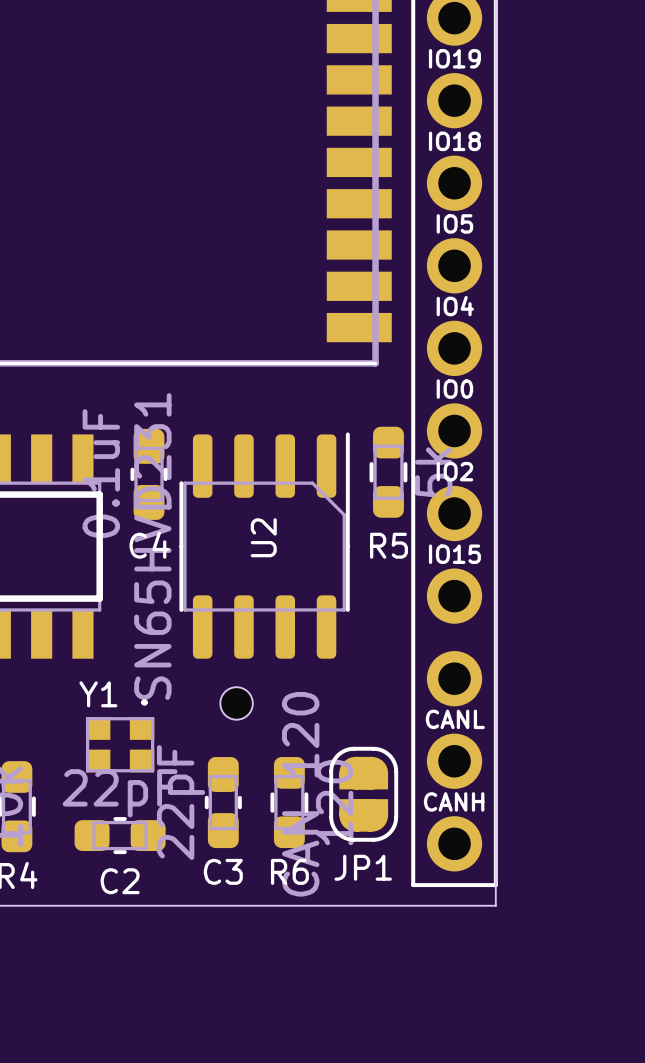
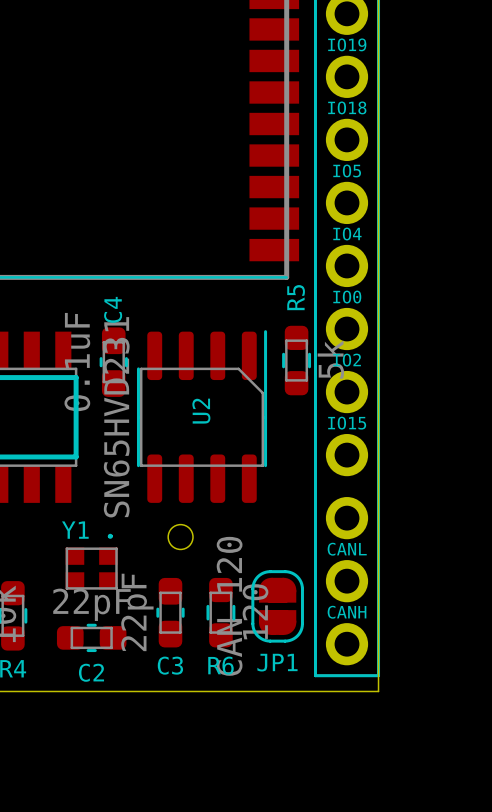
C4 name rotation: 0° (149, 545) -> 90° counterclockwise (113, 309)
C4 name position: C4 (149, 545) -> C4 (113, 309)
R5 name rotation: 0° (389, 545) -> 90° counterclockwise (296, 297)
R5 name position: R5 (389, 545) -> R5 (296, 297)

